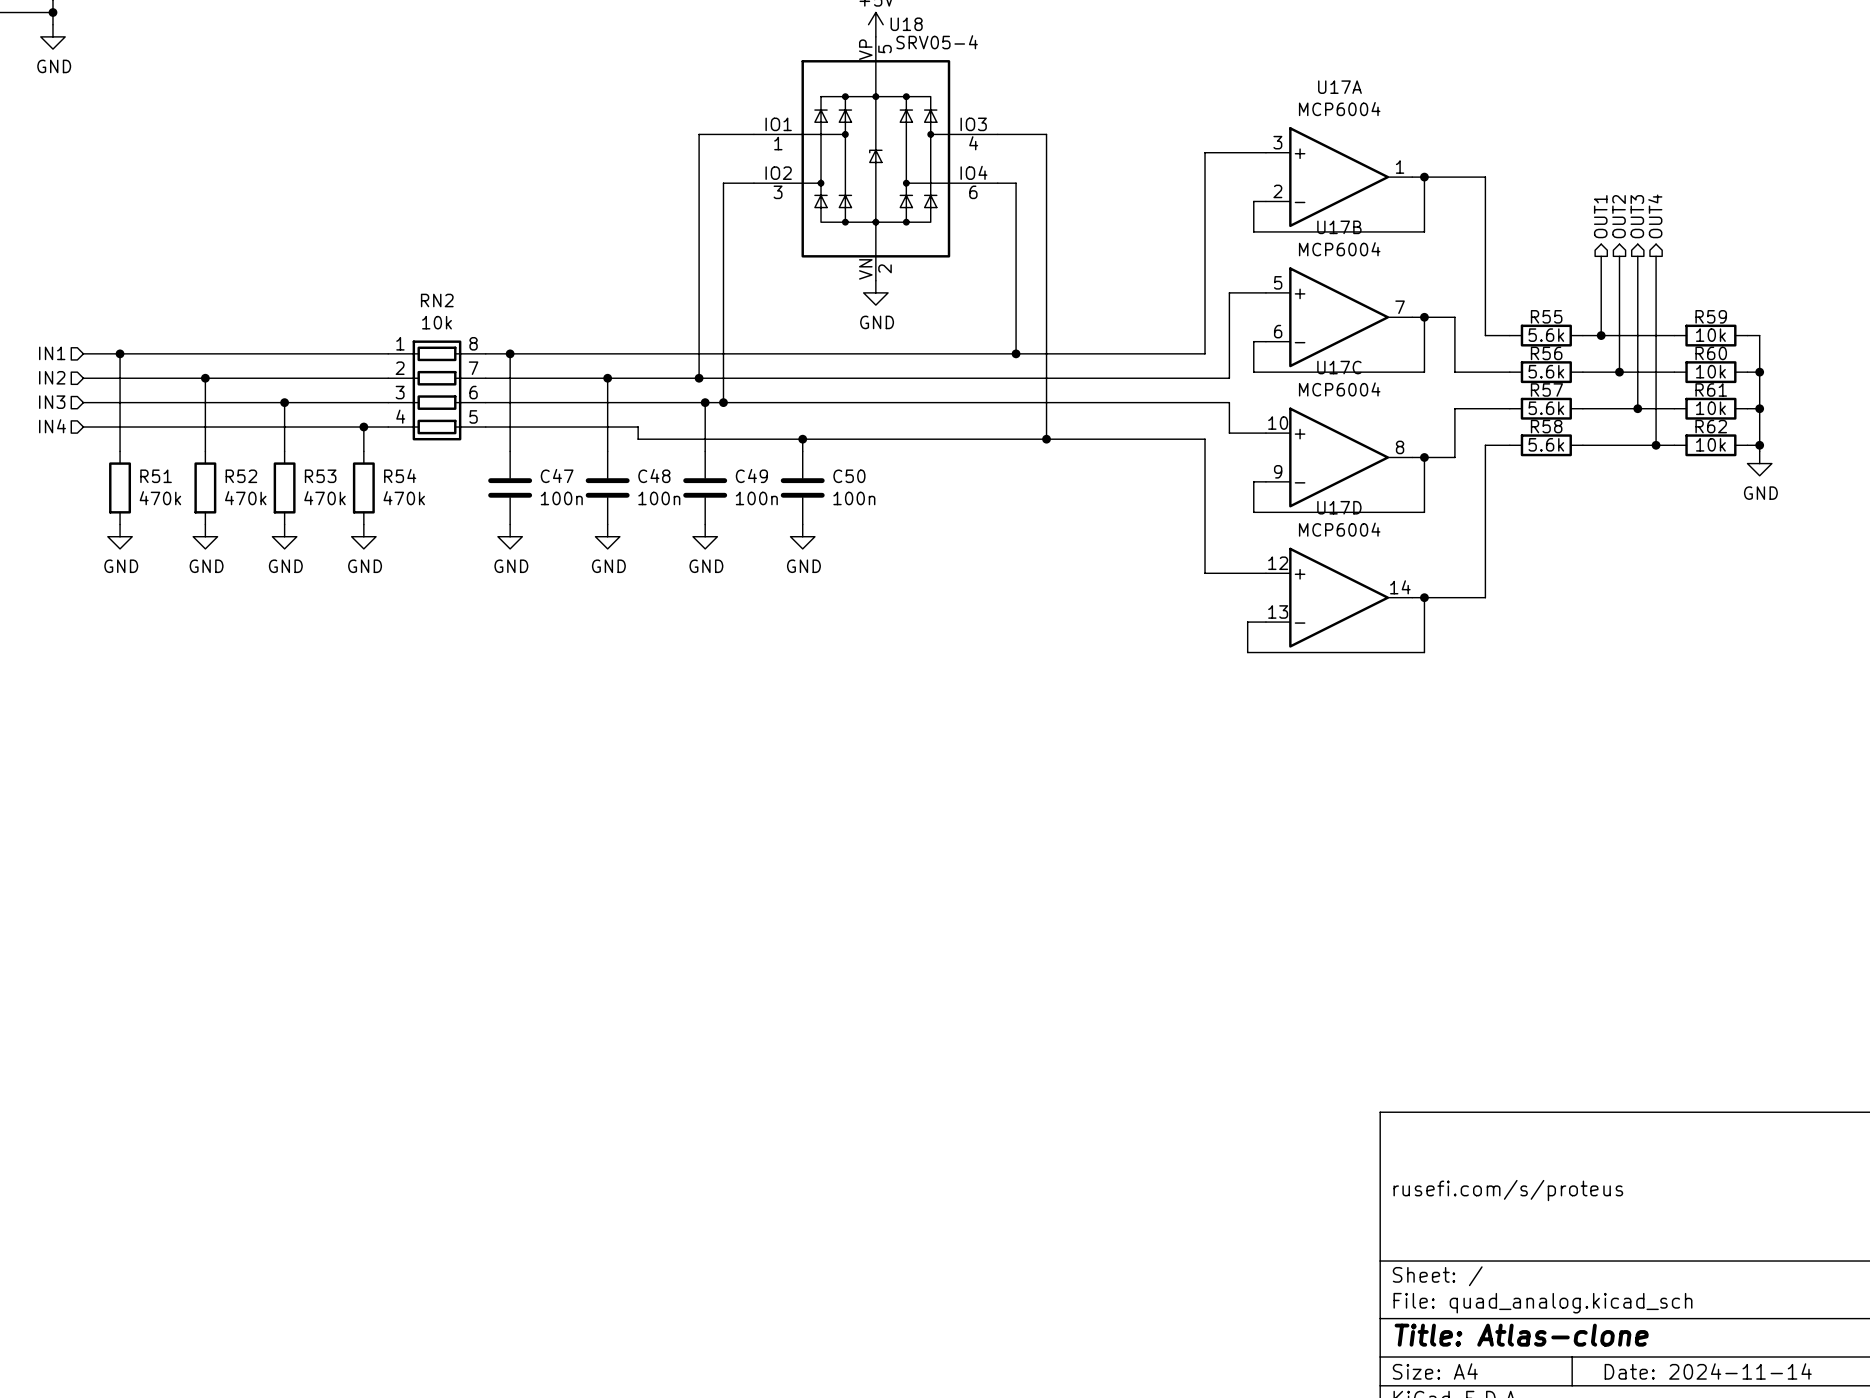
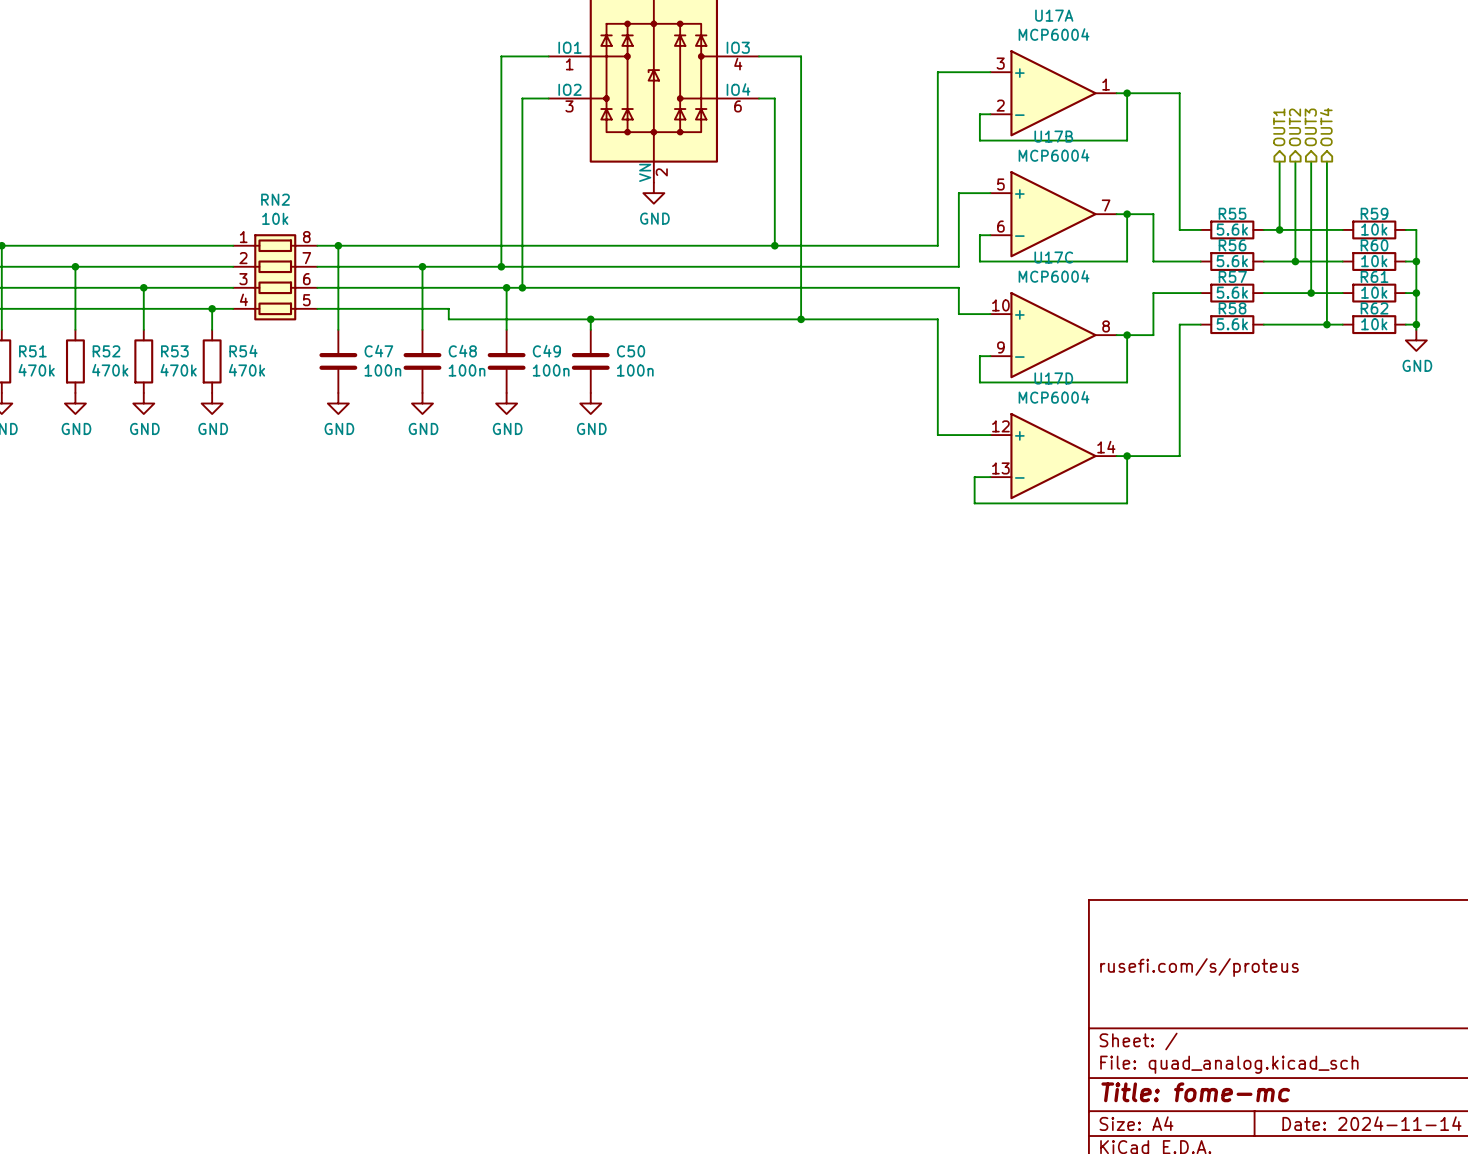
title block: Title: Atlas-clone (1521, 1335) -> Title: fome-mc (1195, 1092)

